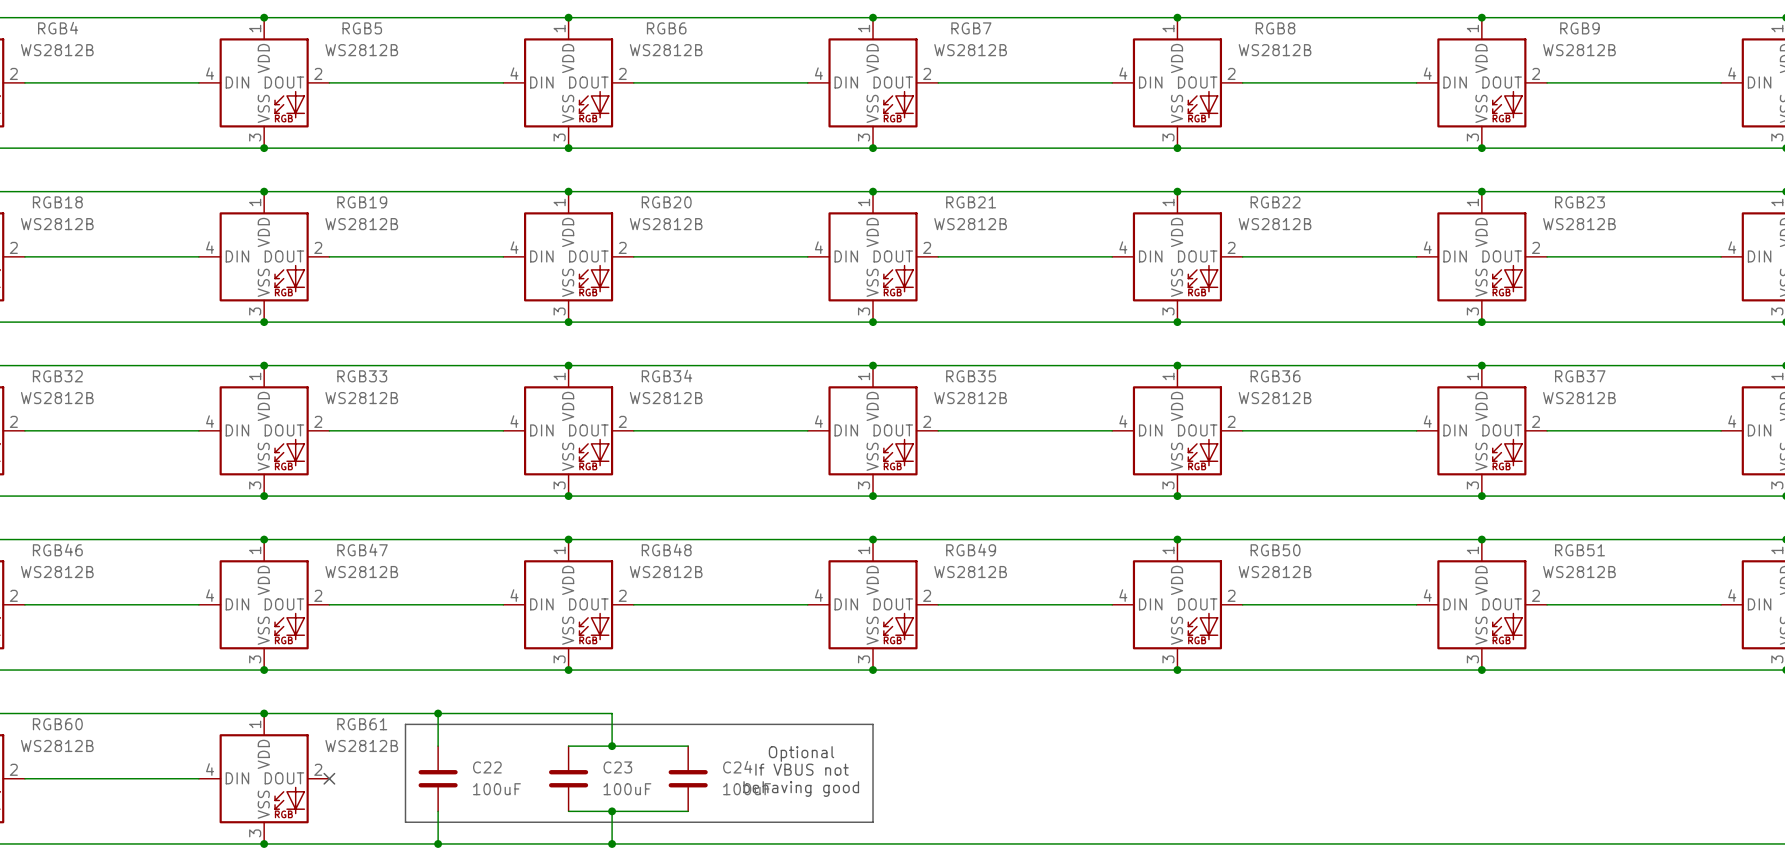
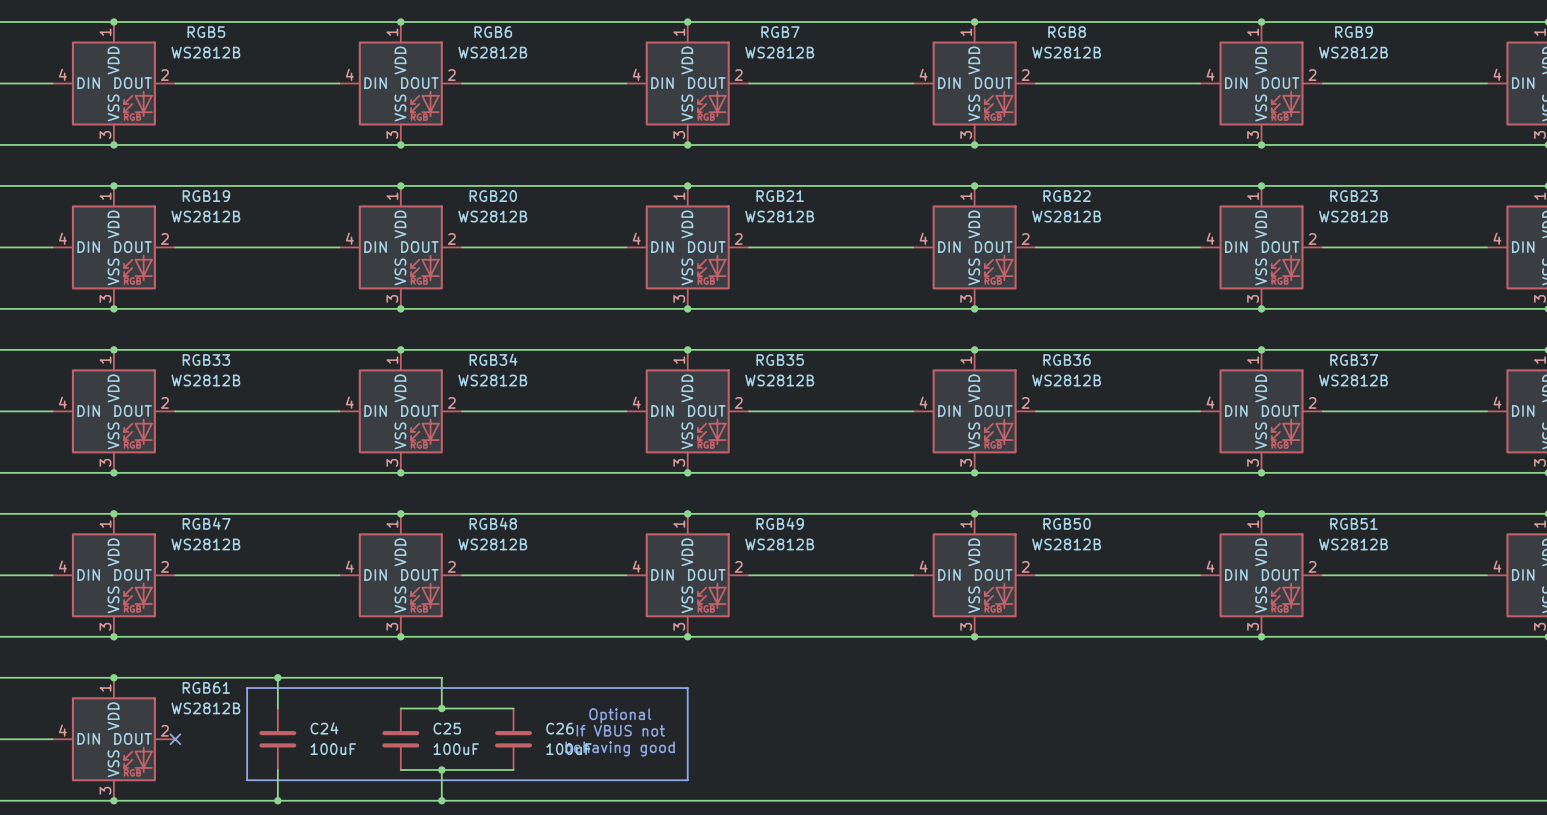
C22 name: C22 (487, 767) -> C24 (324, 728)
C23 name: C23 (617, 767) -> C25 (447, 728)
C24 name: C24 (737, 767) -> C26 (559, 728)

